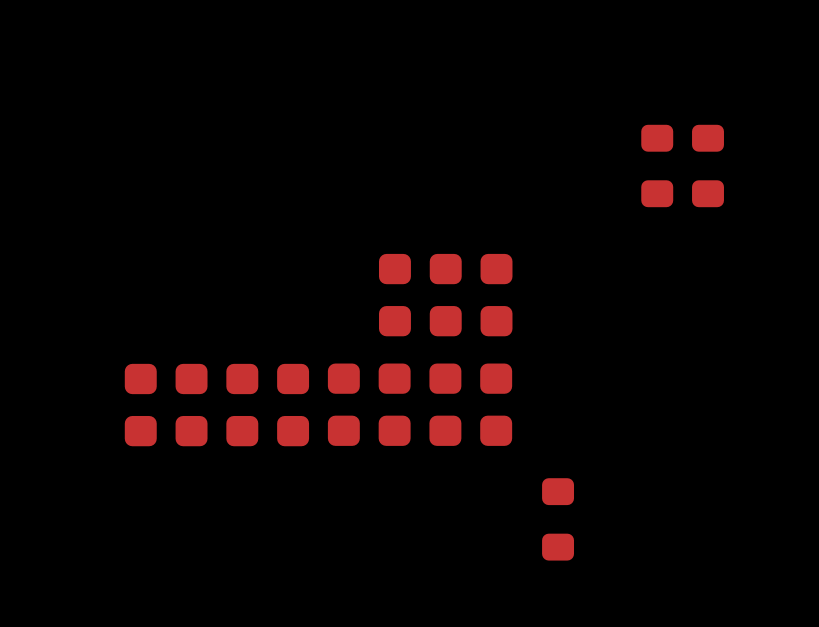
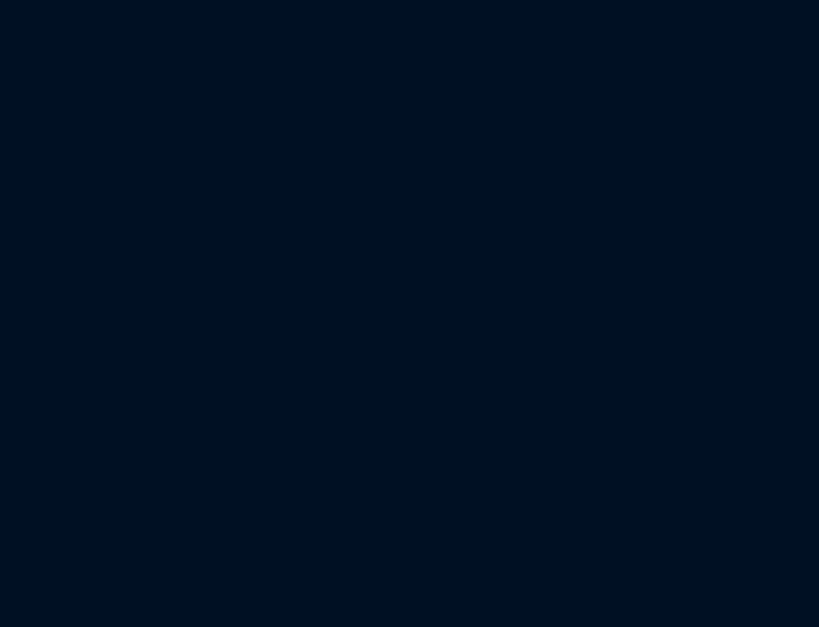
part: (657, 165) -> none
part: (708, 165) -> none
part: (394, 295) -> none
part: (445, 295) -> none
part: (496, 295) -> none
part: (343, 404) -> none
part: (394, 404) -> none
part: (445, 404) -> none
part: (496, 404) -> none
part: (140, 405) -> none
part: (191, 405) -> none
part: (242, 405) -> none
part: (293, 405) -> none
part: (558, 519) -> none

